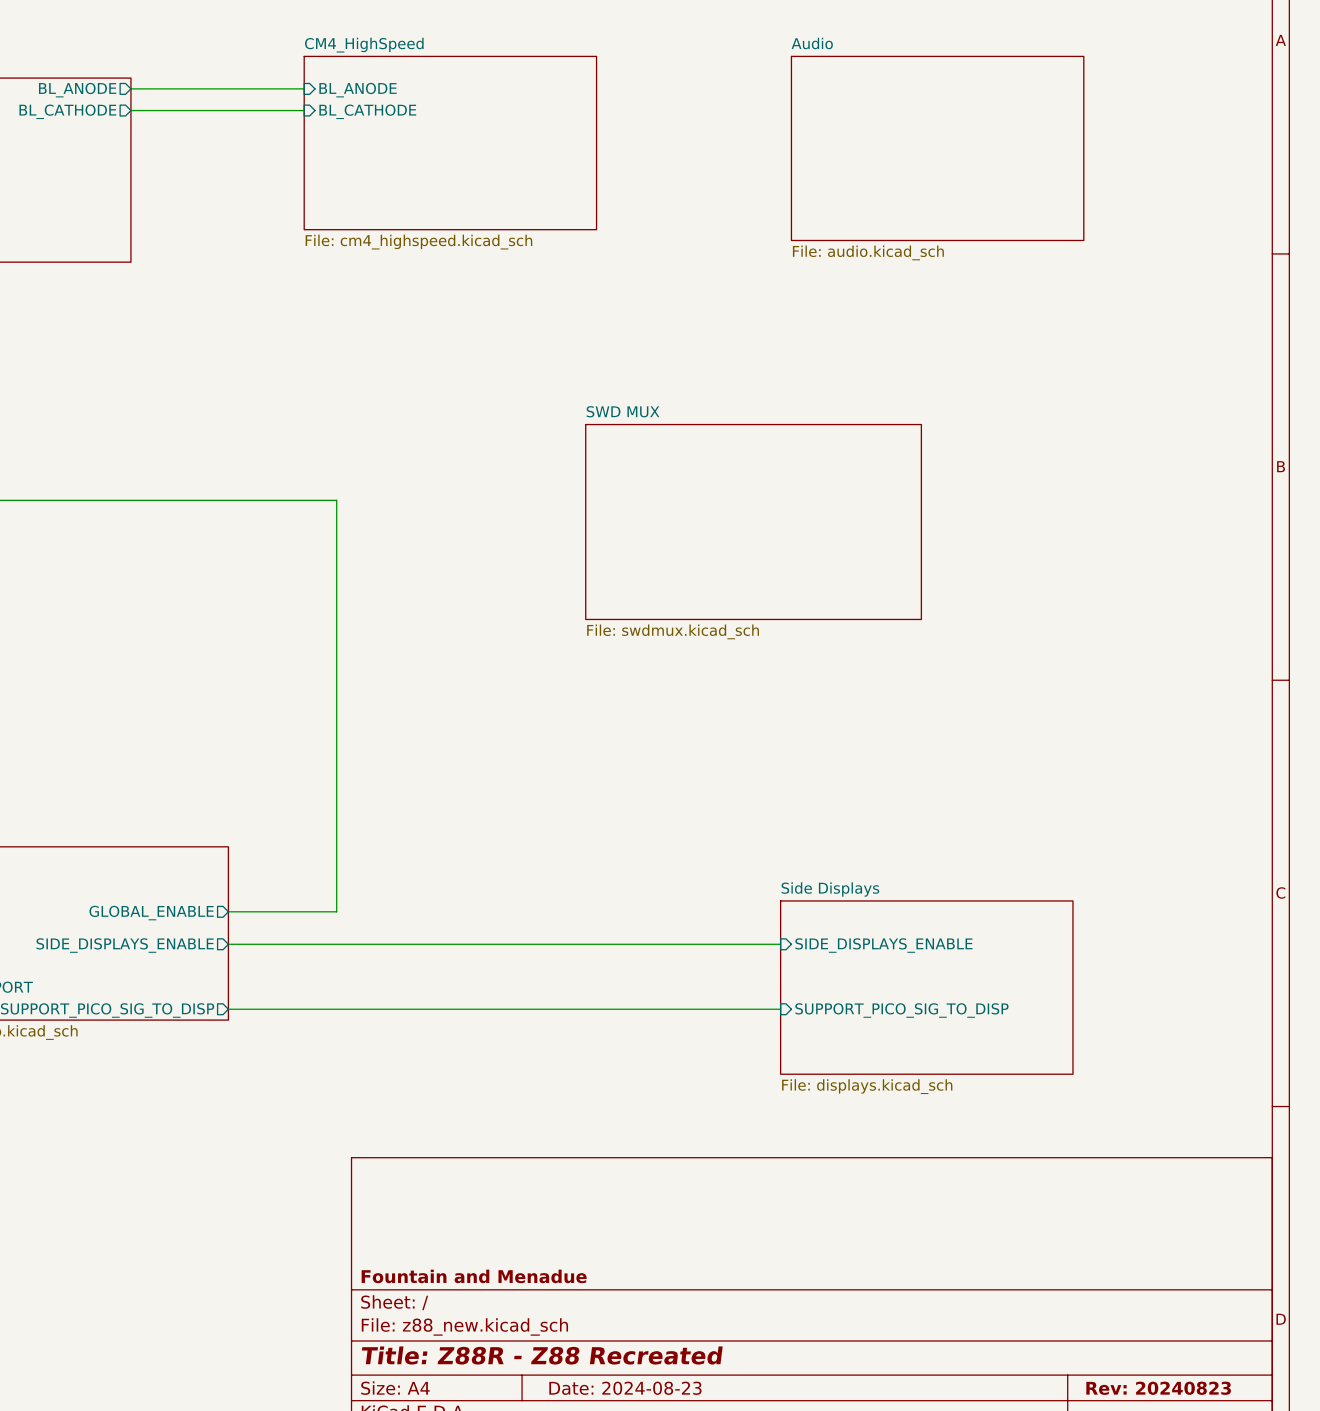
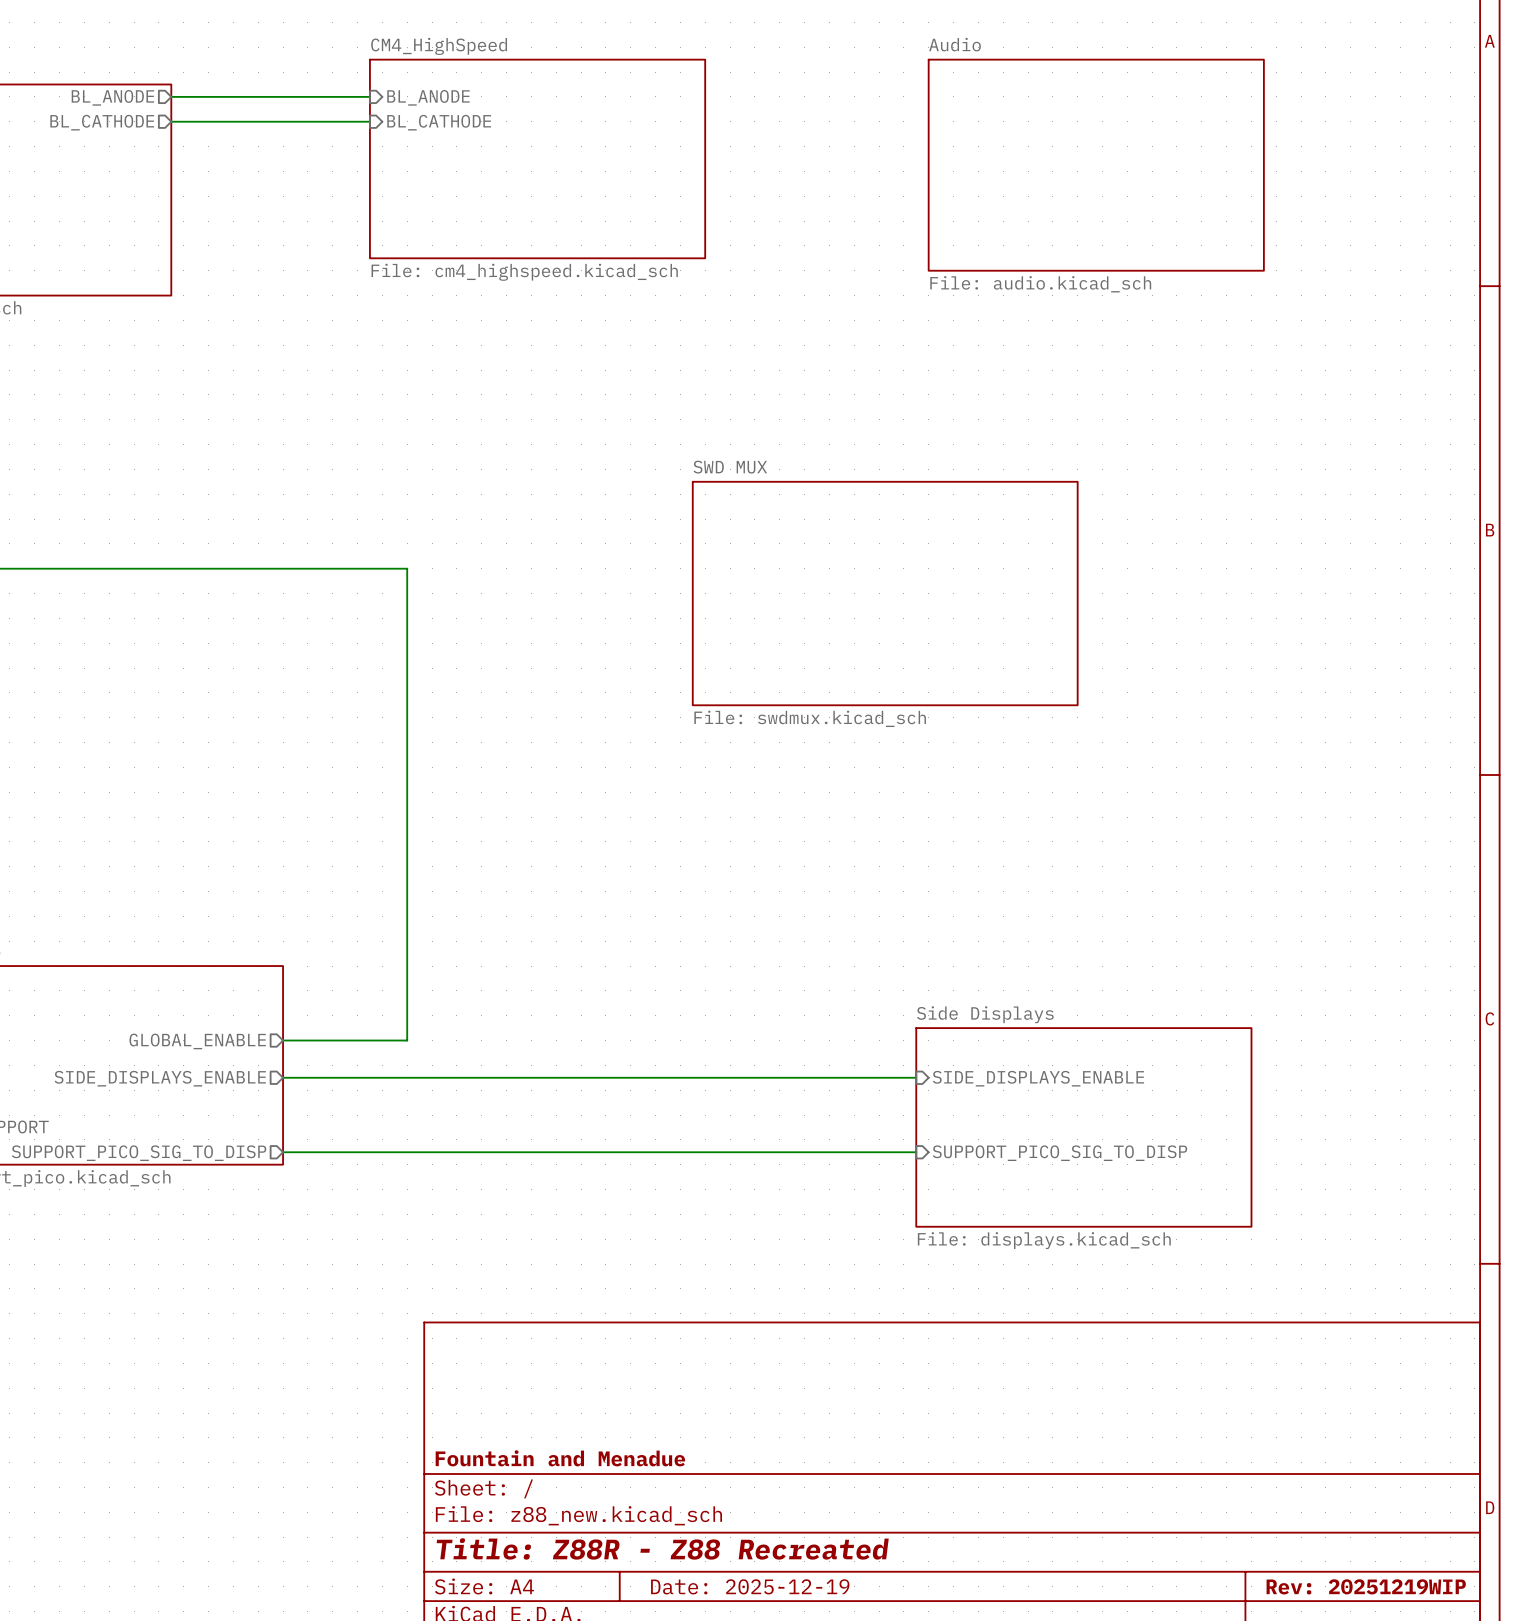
title block: Date: 2024-08-23 (625, 1388) -> Date: 2025-12-19 (750, 1586)
title block: Rev: 20240823 (1158, 1388) -> Rev: 20251219WIP (1366, 1586)

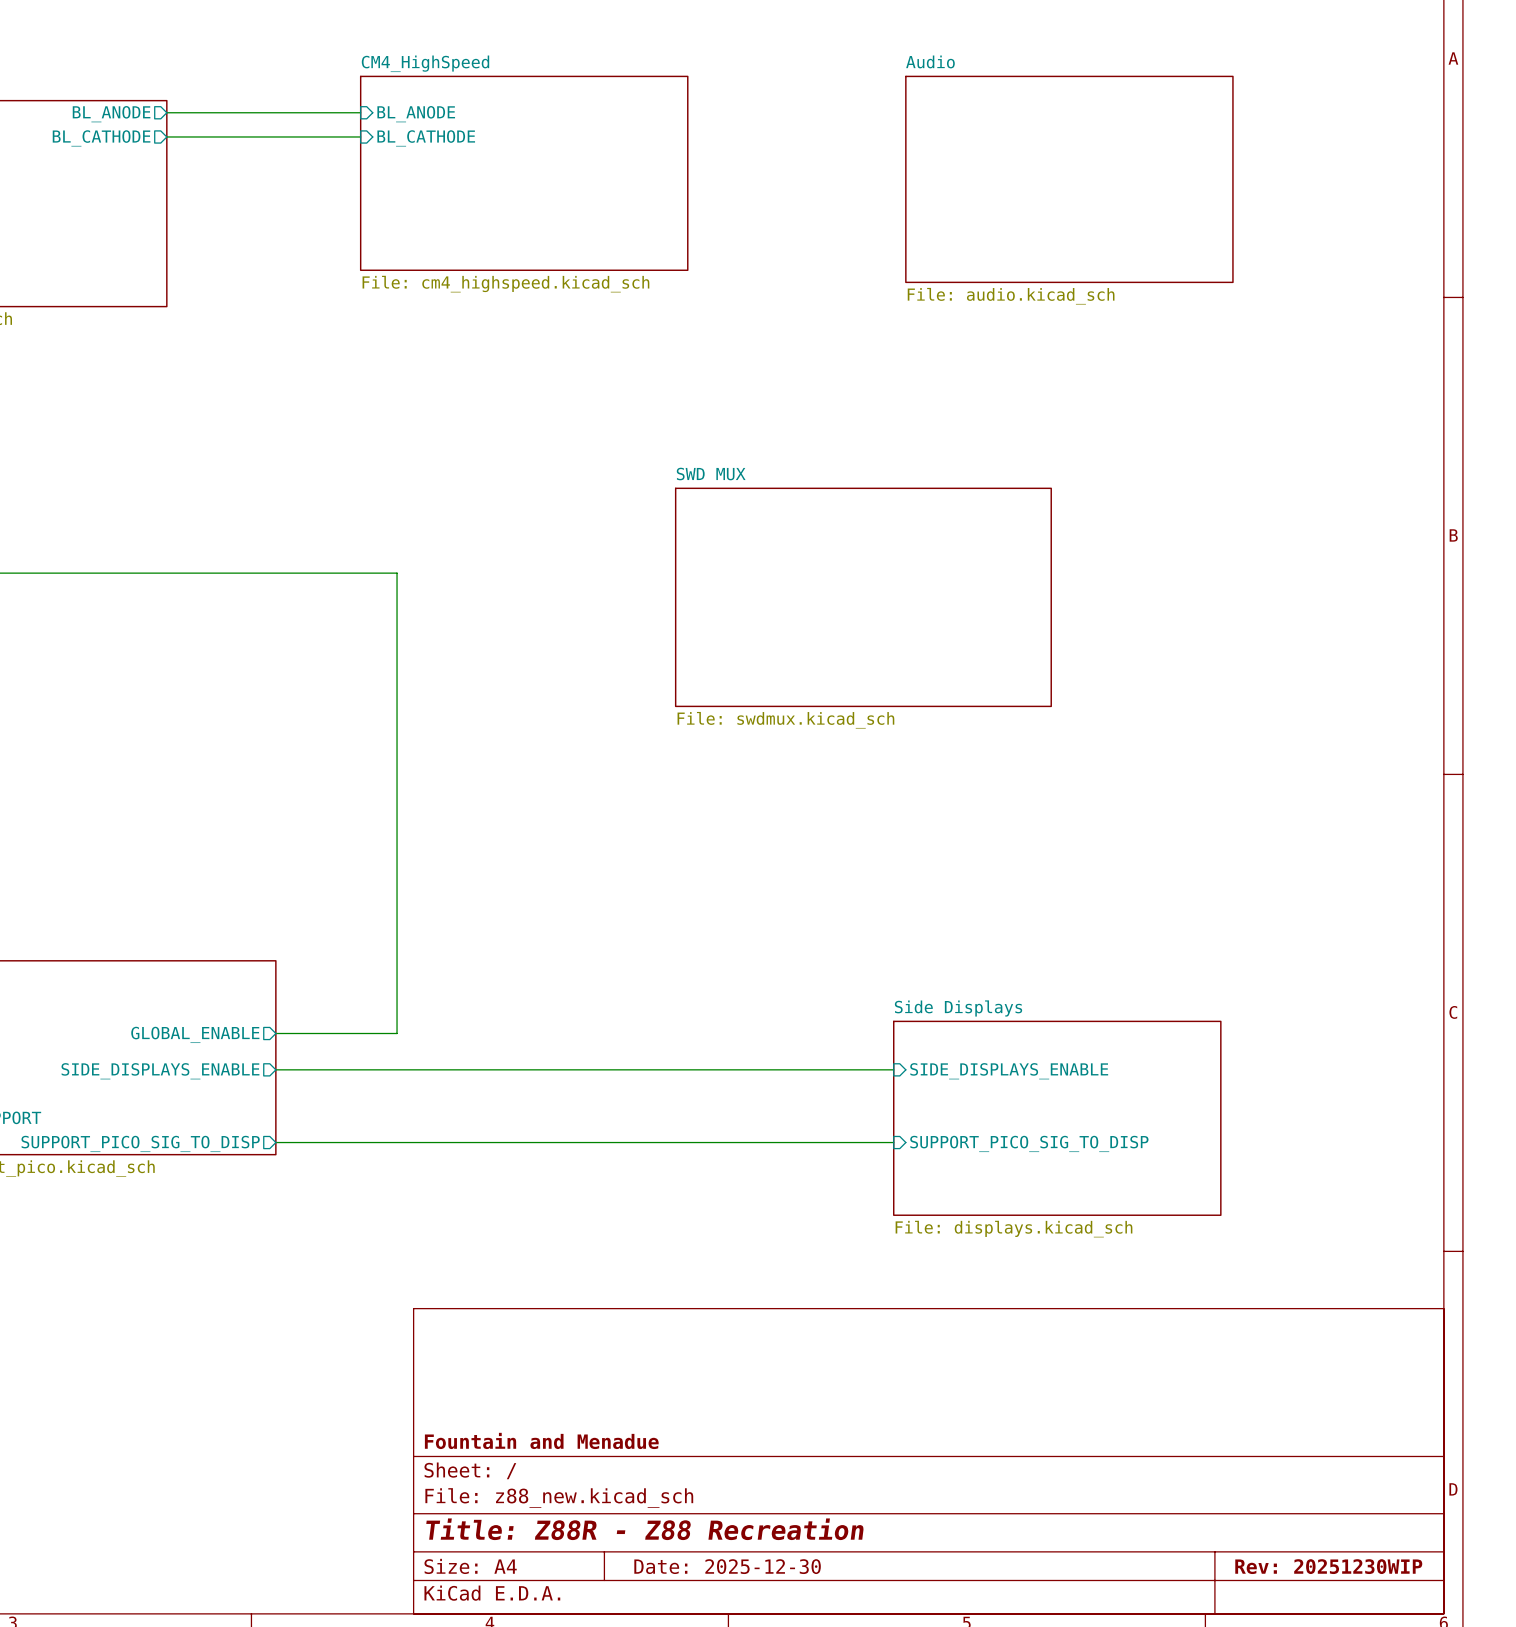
title block: Title: Z88R - Z88 Recreated (662, 1548) -> Title: Z88R - Z88 Recreation (645, 1529)
title block: Date: 2025-12-19 (750, 1586) -> Date: 2025-12-30 (727, 1566)
title block: Rev: 20251219WIP (1366, 1586) -> Rev: 20251230WIP (1328, 1566)

